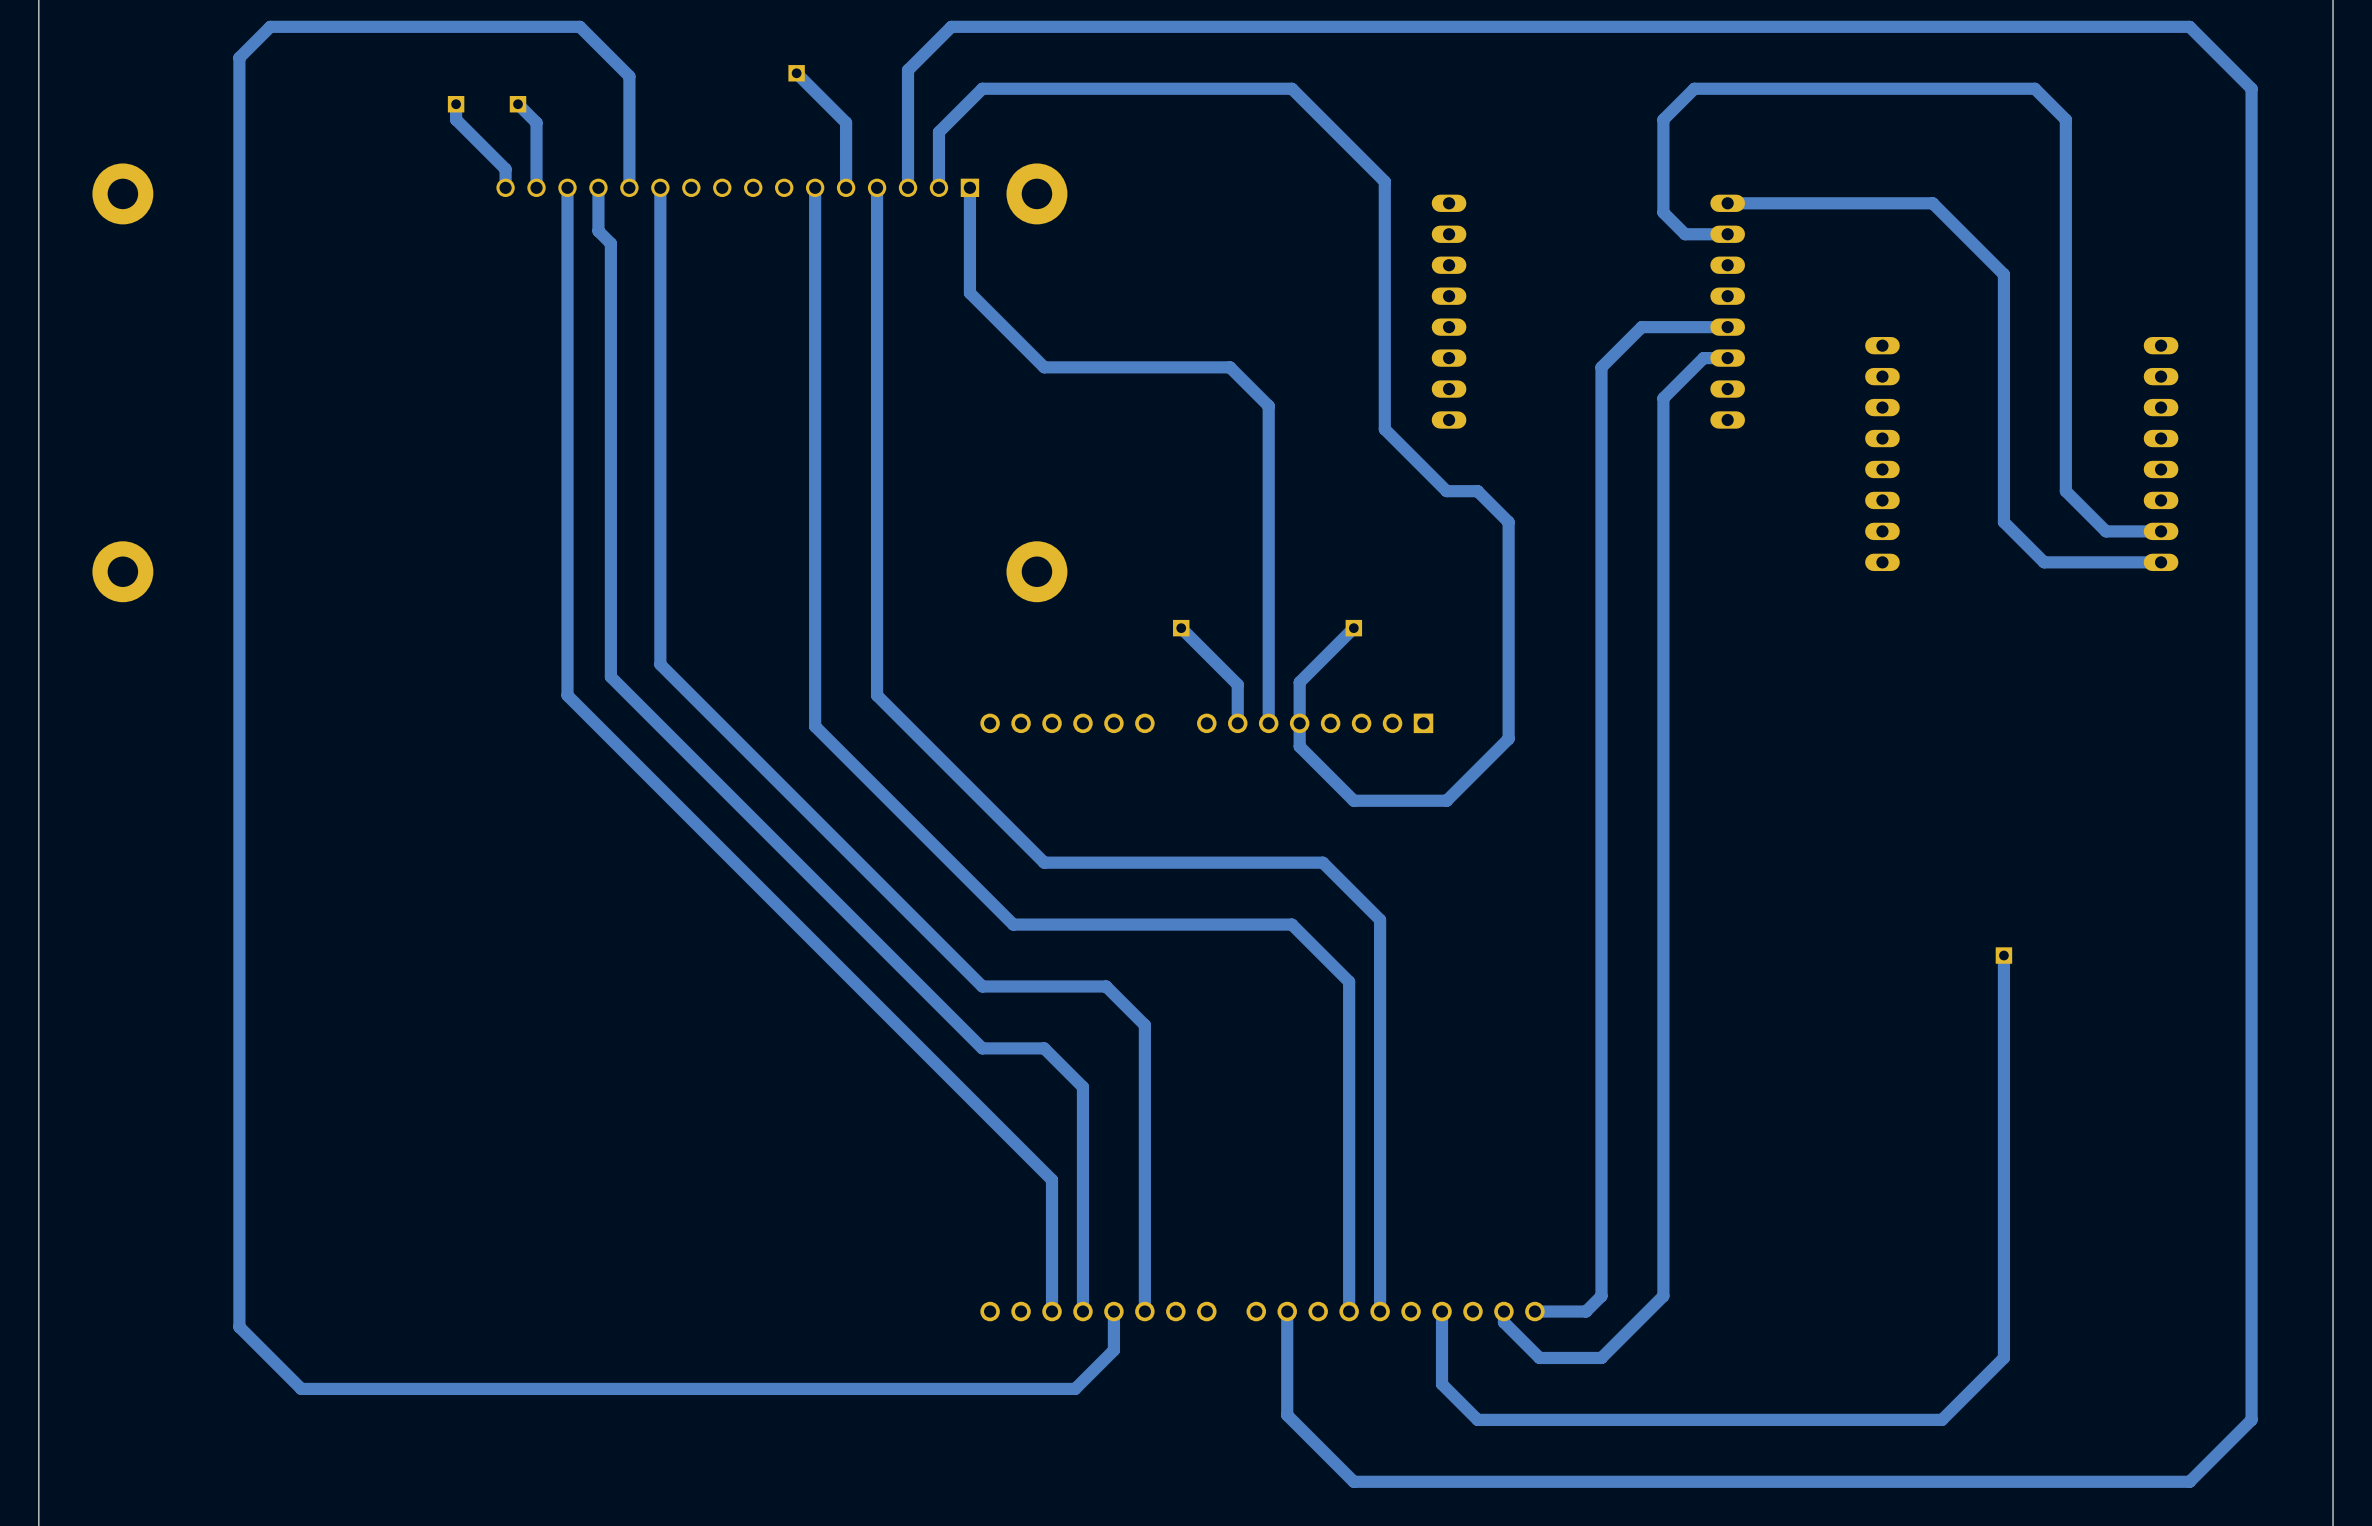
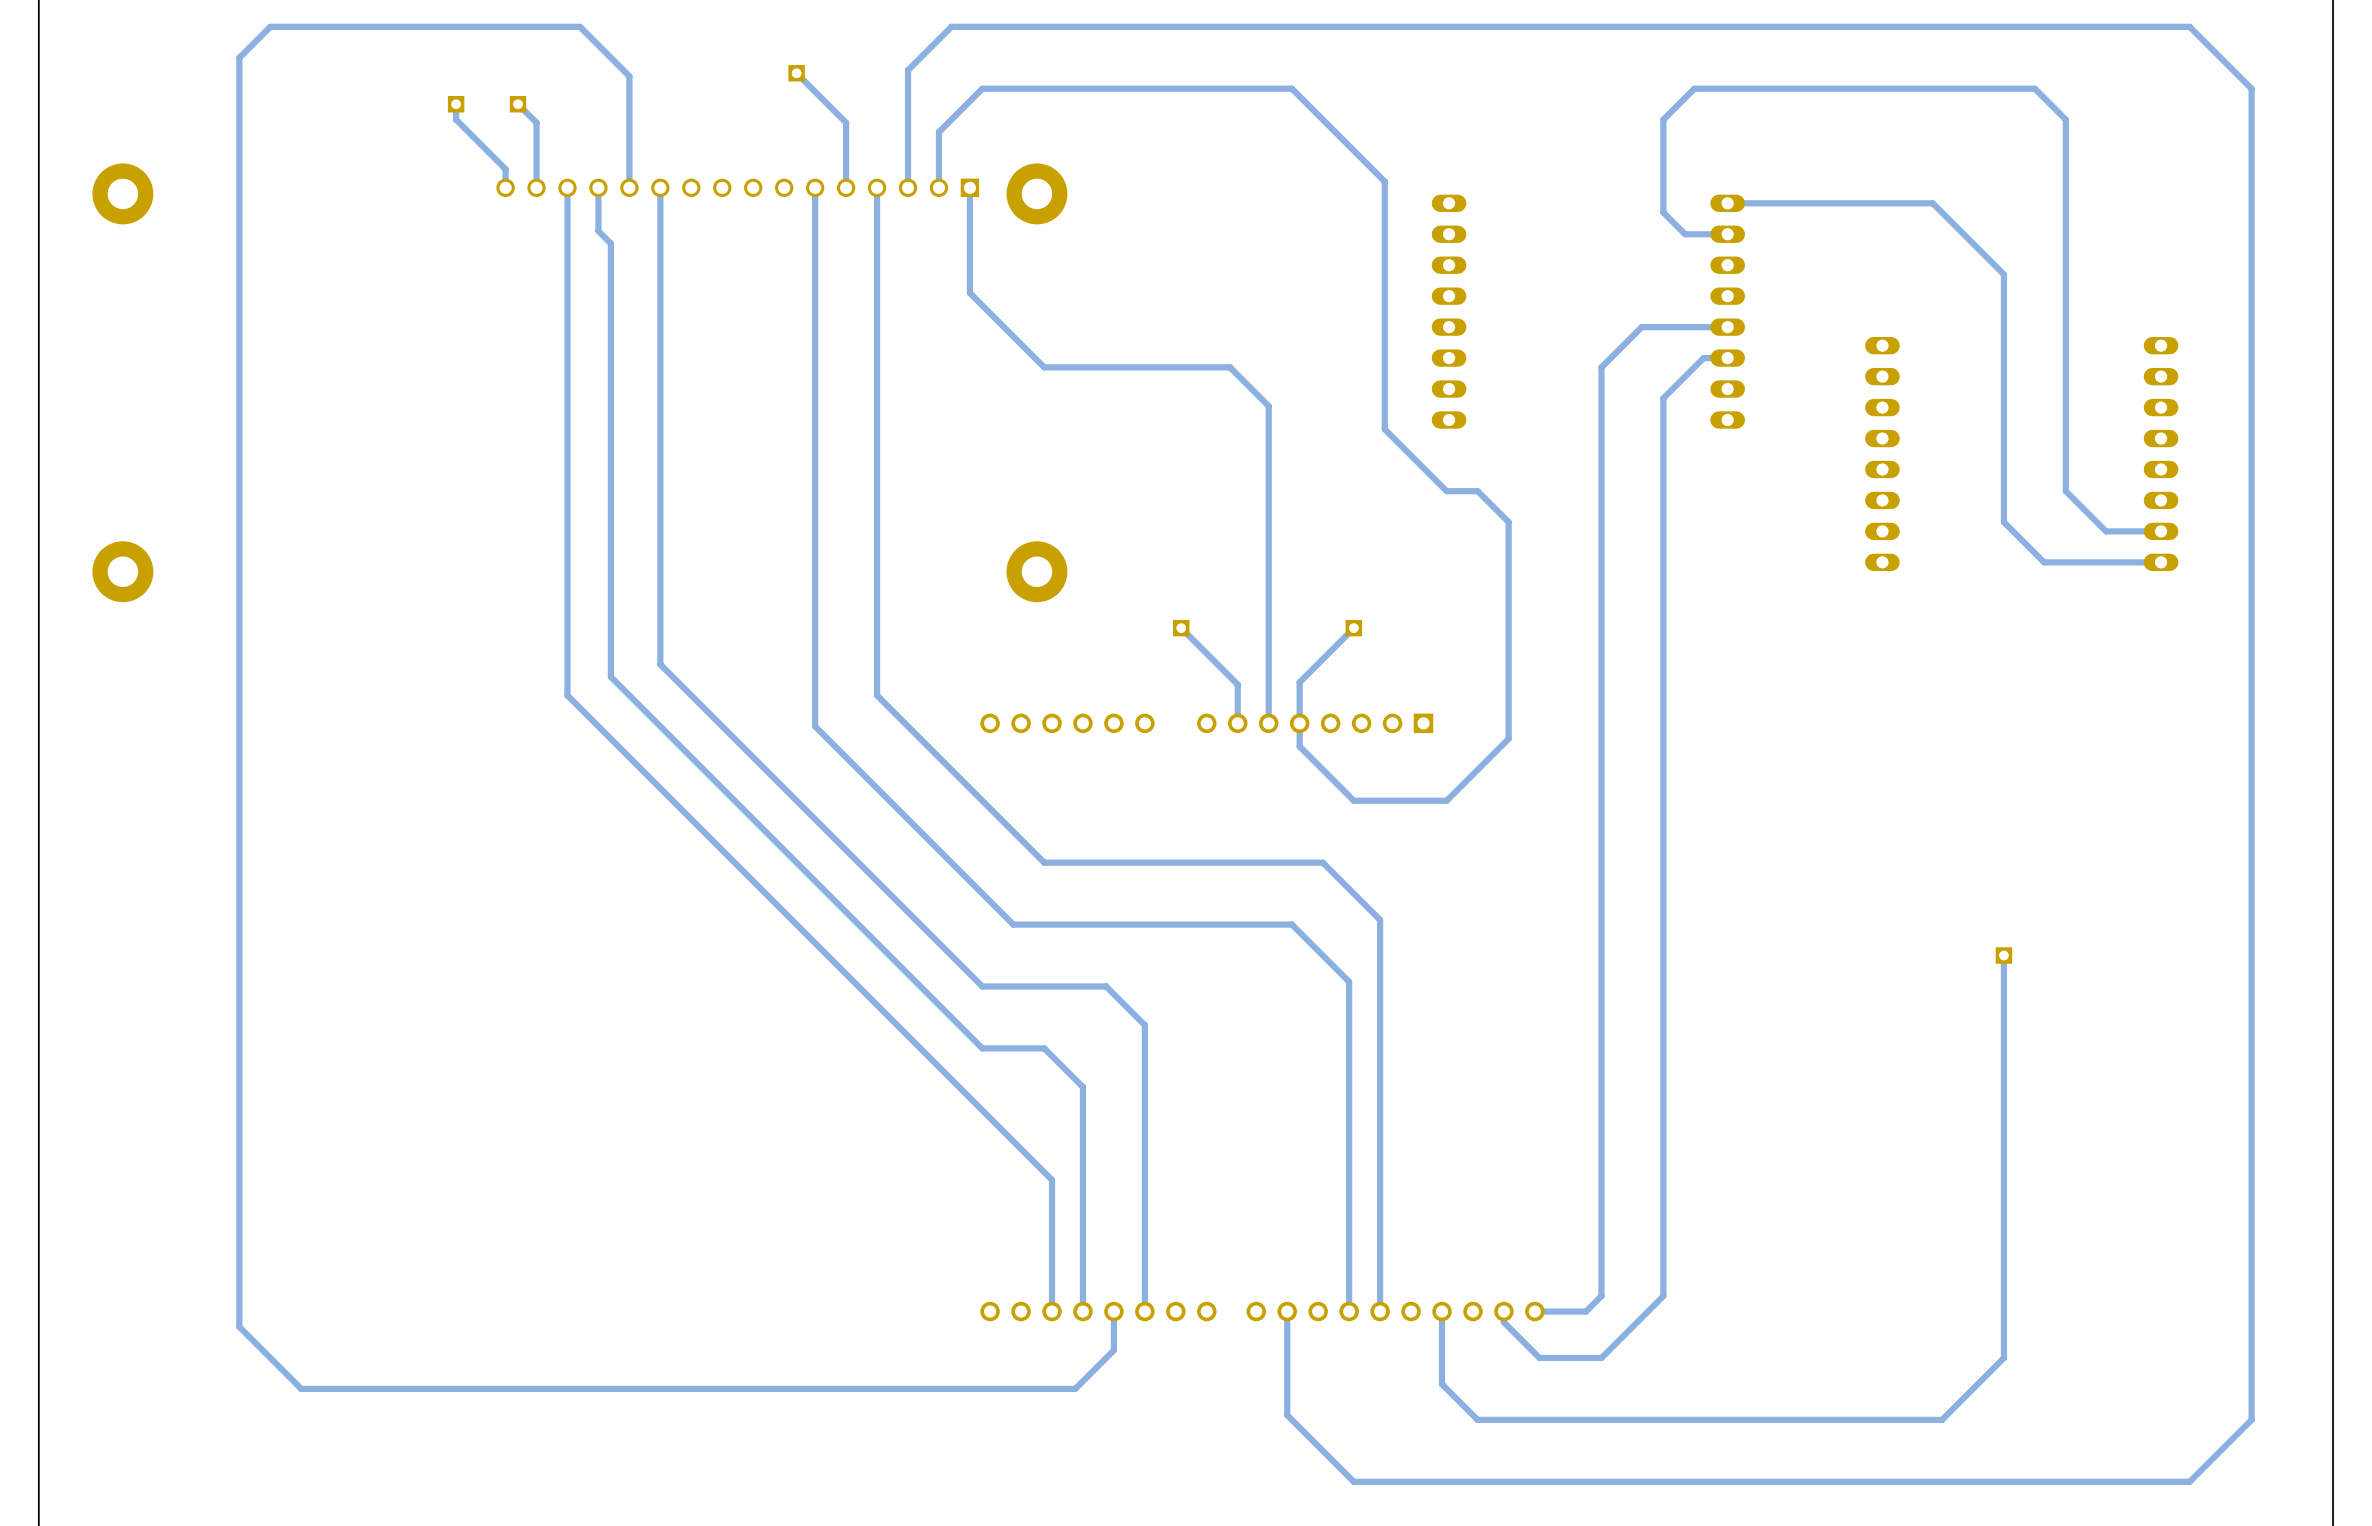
track width: thick (796, 73) (846, 122) (846, 187) -> thin (796, 73) (846, 122) (846, 187)
track width: thick (456, 104) (456, 119) (505, 169) (505, 187) -> thin (456, 104) (456, 119) (505, 169) (505, 187)
track width: thick (518, 104) (536, 122) (536, 187) -> thin (518, 104) (536, 122) (536, 187)
track width: thick (567, 187) (567, 695) (1052, 1179) (1052, 1311) -> thin (567, 187) (567, 695) (1052, 1179) (1052, 1311)
track width: thick (598, 187) (598, 231) (610, 243) (610, 676) (982, 1048) (1044, 1048) (1082, 1087) (1082, 1311) -> thin (598, 187) (598, 231) (610, 243) (610, 676) (982, 1048) (1044, 1048) (1082, 1087) (1082, 1311)
track width: thick (629, 187) (629, 76) (579, 26) (270, 26) (239, 57) (239, 1327) (301, 1388) (1075, 1388) (1113, 1350) (1113, 1311) -> thin (629, 187) (629, 76) (579, 26) (270, 26) (239, 57) (239, 1327) (301, 1388) (1075, 1388) (1113, 1350) (1113, 1311)
track width: thick (660, 187) (660, 664) (982, 986) (1106, 986) (1144, 1025) (1144, 1311) -> thin (660, 187) (660, 664) (982, 986) (1106, 986) (1144, 1025) (1144, 1311)
track width: thick (815, 187) (815, 726) (1013, 924) (1291, 924) (1349, 981) (1349, 1311) -> thin (815, 187) (815, 726) (1013, 924) (1291, 924) (1349, 981) (1349, 1311)
track width: thick (877, 187) (877, 695) (1044, 862) (1322, 862) (1380, 919) (1380, 1311) -> thin (877, 187) (877, 695) (1044, 862) (1322, 862) (1380, 919) (1380, 1311)
track width: thick (908, 187) (908, 70) (951, 26) (2189, 26) (2251, 88) (2251, 1419) (2189, 1481) (1353, 1481) (1287, 1415) (1287, 1311) -> thin (908, 187) (908, 70) (951, 26) (2189, 26) (2251, 88) (2251, 1419) (2189, 1481) (1353, 1481) (1287, 1415) (1287, 1311)
track width: thick (938, 187) (938, 132) (982, 88) (1291, 88) (1384, 181) (1384, 429) (1446, 491) (1477, 491) (1508, 522) (1508, 738) (1446, 800) (1353, 800) (1299, 746) (1299, 682) (1353, 628) -> thin (938, 187) (938, 132) (982, 88) (1291, 88) (1384, 181) (1384, 429) (1446, 491) (1477, 491) (1508, 522) (1508, 738) (1446, 800) (1353, 800) (1299, 746) (1299, 682) (1353, 628)
track width: thick (969, 187) (969, 293) (1044, 367) (1230, 367) (1268, 406) (1268, 723) -> thin (969, 187) (969, 293) (1044, 367) (1230, 367) (1268, 406) (1268, 723)
track width: thick (1727, 203) (1932, 203) (2003, 274) (2003, 522) (2044, 562) (2161, 562) -> thin (1727, 203) (1932, 203) (2003, 274) (2003, 522) (2044, 562) (2161, 562)
track width: thick (1727, 234) (1685, 234) (1663, 212) (1663, 119) (1694, 88) (2034, 88) (2065, 119) (2065, 491) (2106, 531) (2161, 531) -> thin (1727, 234) (1685, 234) (1663, 212) (1663, 119) (1694, 88) (2034, 88) (2065, 119) (2065, 491) (2106, 531) (2161, 531)
track width: thick (1727, 327) (1641, 327) (1601, 367) (1601, 1296) (1586, 1311) (1534, 1311) -> thin (1727, 327) (1641, 327) (1601, 367) (1601, 1296) (1586, 1311) (1534, 1311)
track width: thick (1727, 358) (1703, 358) (1663, 398) (1663, 1296) (1601, 1357) (1539, 1357) (1503, 1322) (1503, 1311) -> thin (1727, 358) (1703, 358) (1663, 398) (1663, 1296) (1601, 1357) (1539, 1357) (1503, 1322) (1503, 1311)
track width: thick (1181, 628) (1237, 684) (1237, 723) -> thin (1181, 628) (1237, 684) (1237, 723)
track width: thick (2003, 955) (2003, 1357) (1942, 1419) (1477, 1419) (1442, 1384) (1442, 1311) -> thin (2003, 955) (2003, 1357) (1942, 1419) (1477, 1419) (1442, 1384) (1442, 1311)

